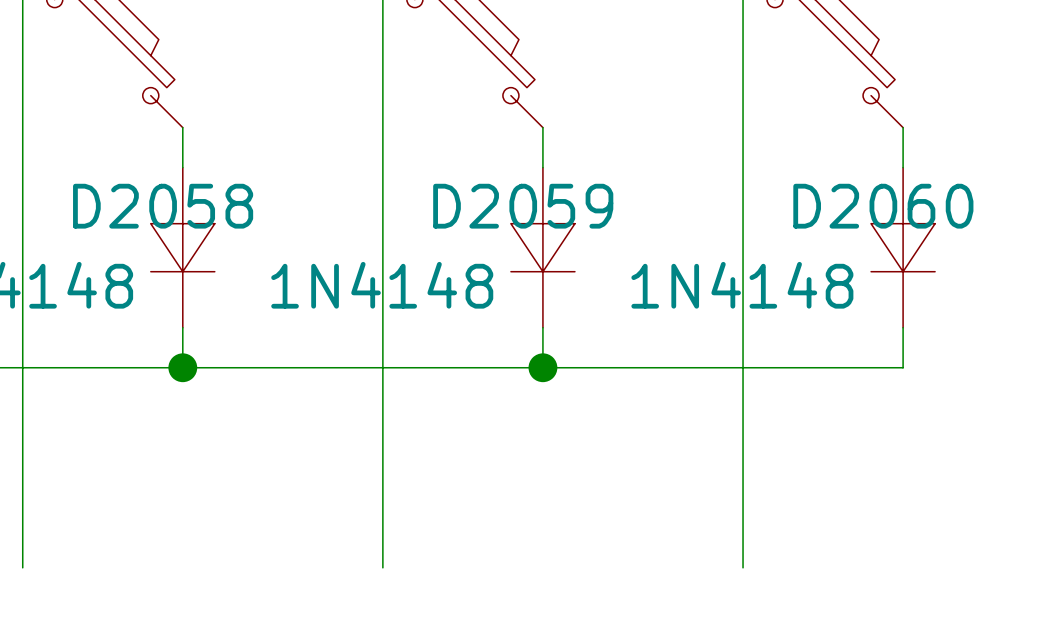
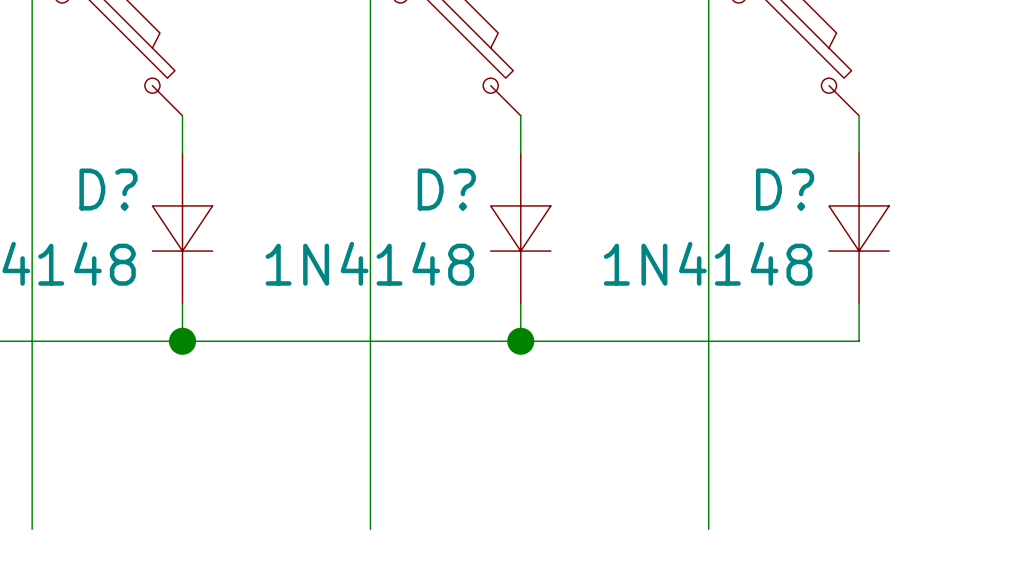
D2058 name: D2058 (163, 206) -> D? (108, 189)
D2059 name: D2059 (523, 206) -> D? (446, 189)
D2060 name: D2060 (883, 206) -> D? (785, 189)

